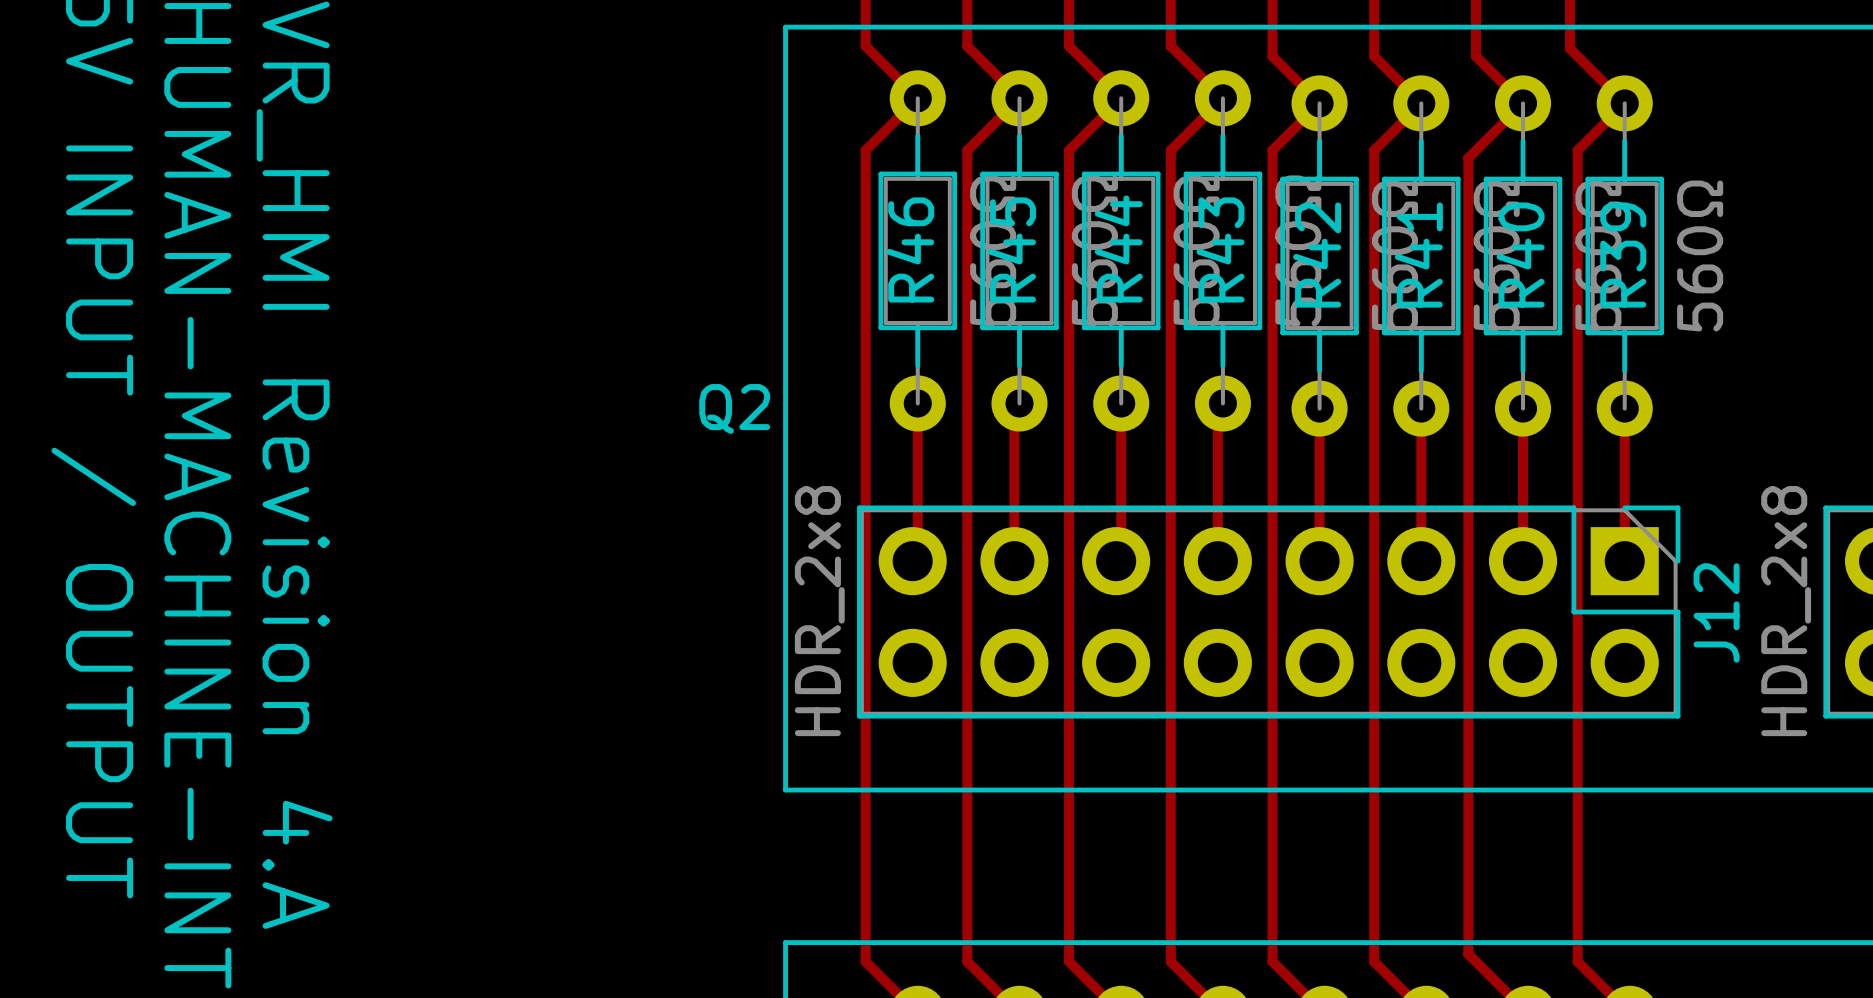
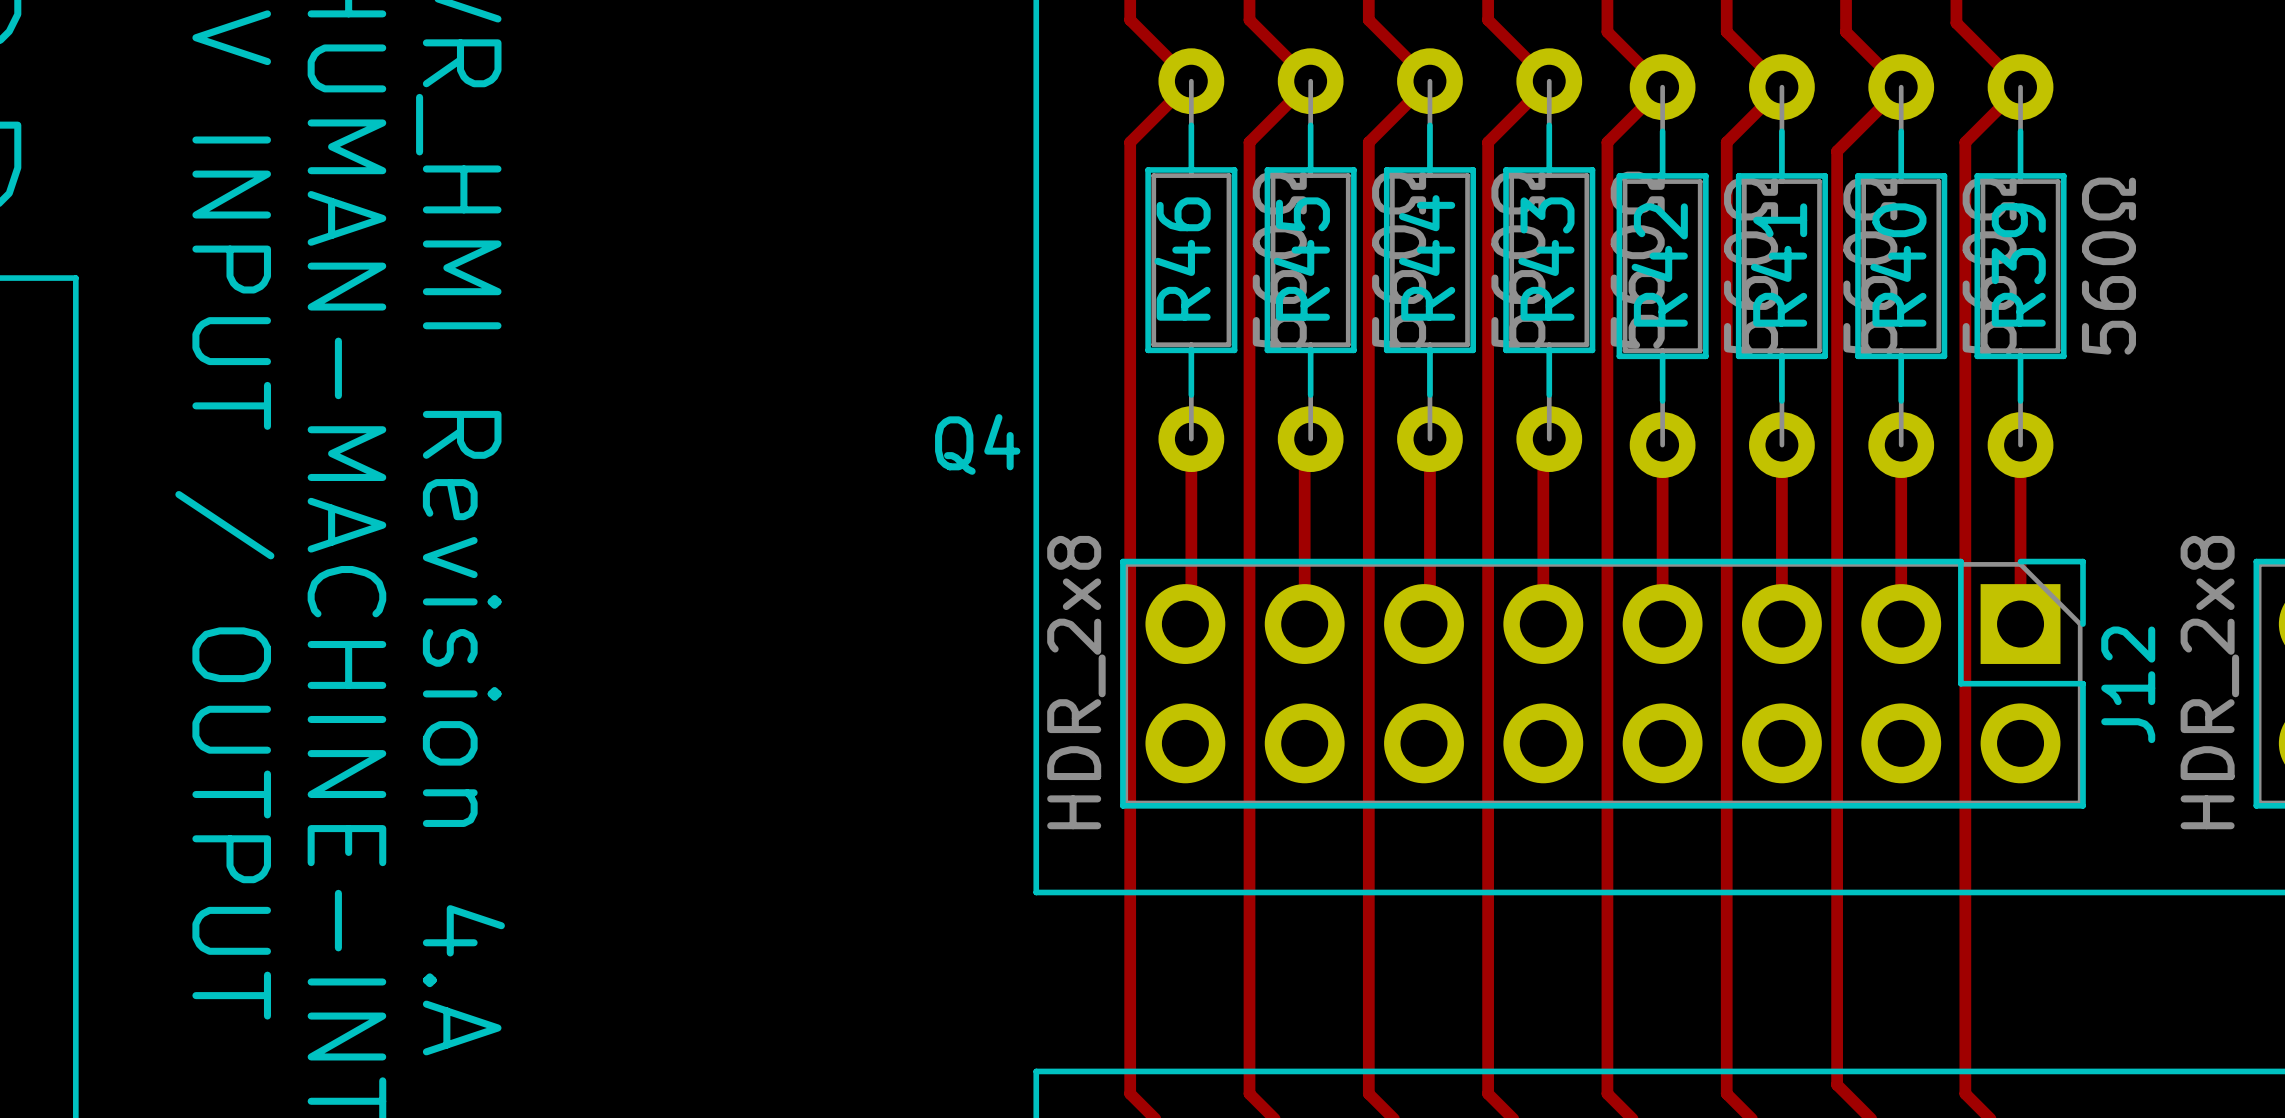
text: Q2 (734, 408) -> Q4 (977, 444)

